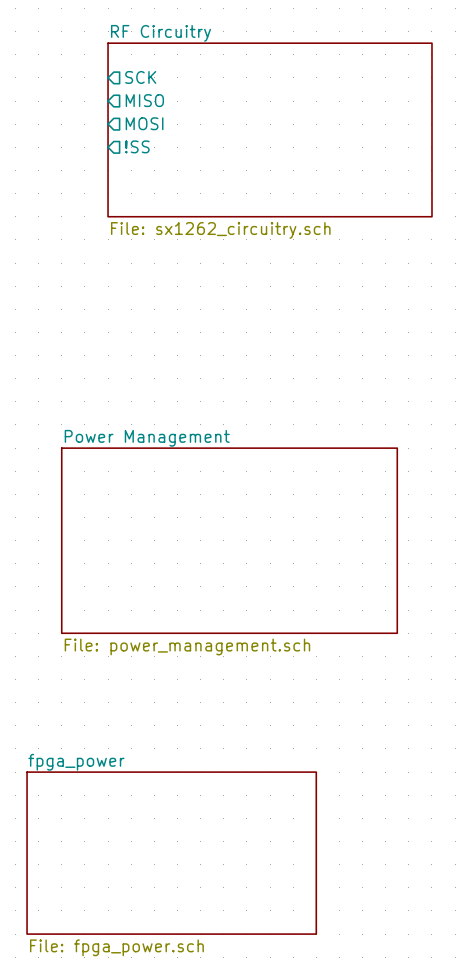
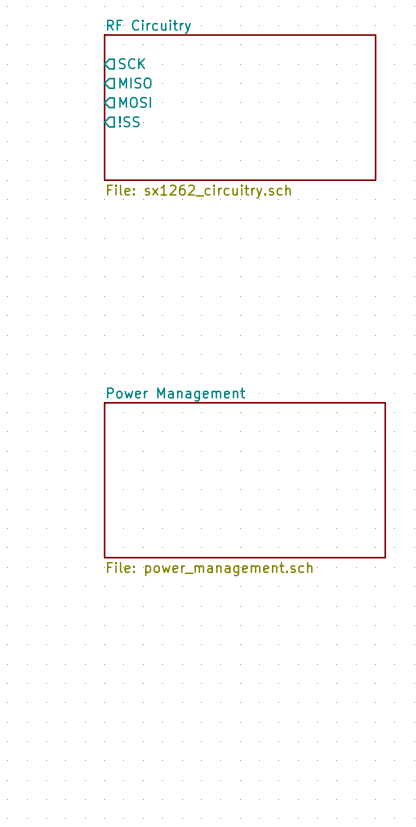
sheet Power Management position: (229, 540) -> (244, 480)
sheet fpga_power: File: fpga_power.sch (171, 853) -> none

